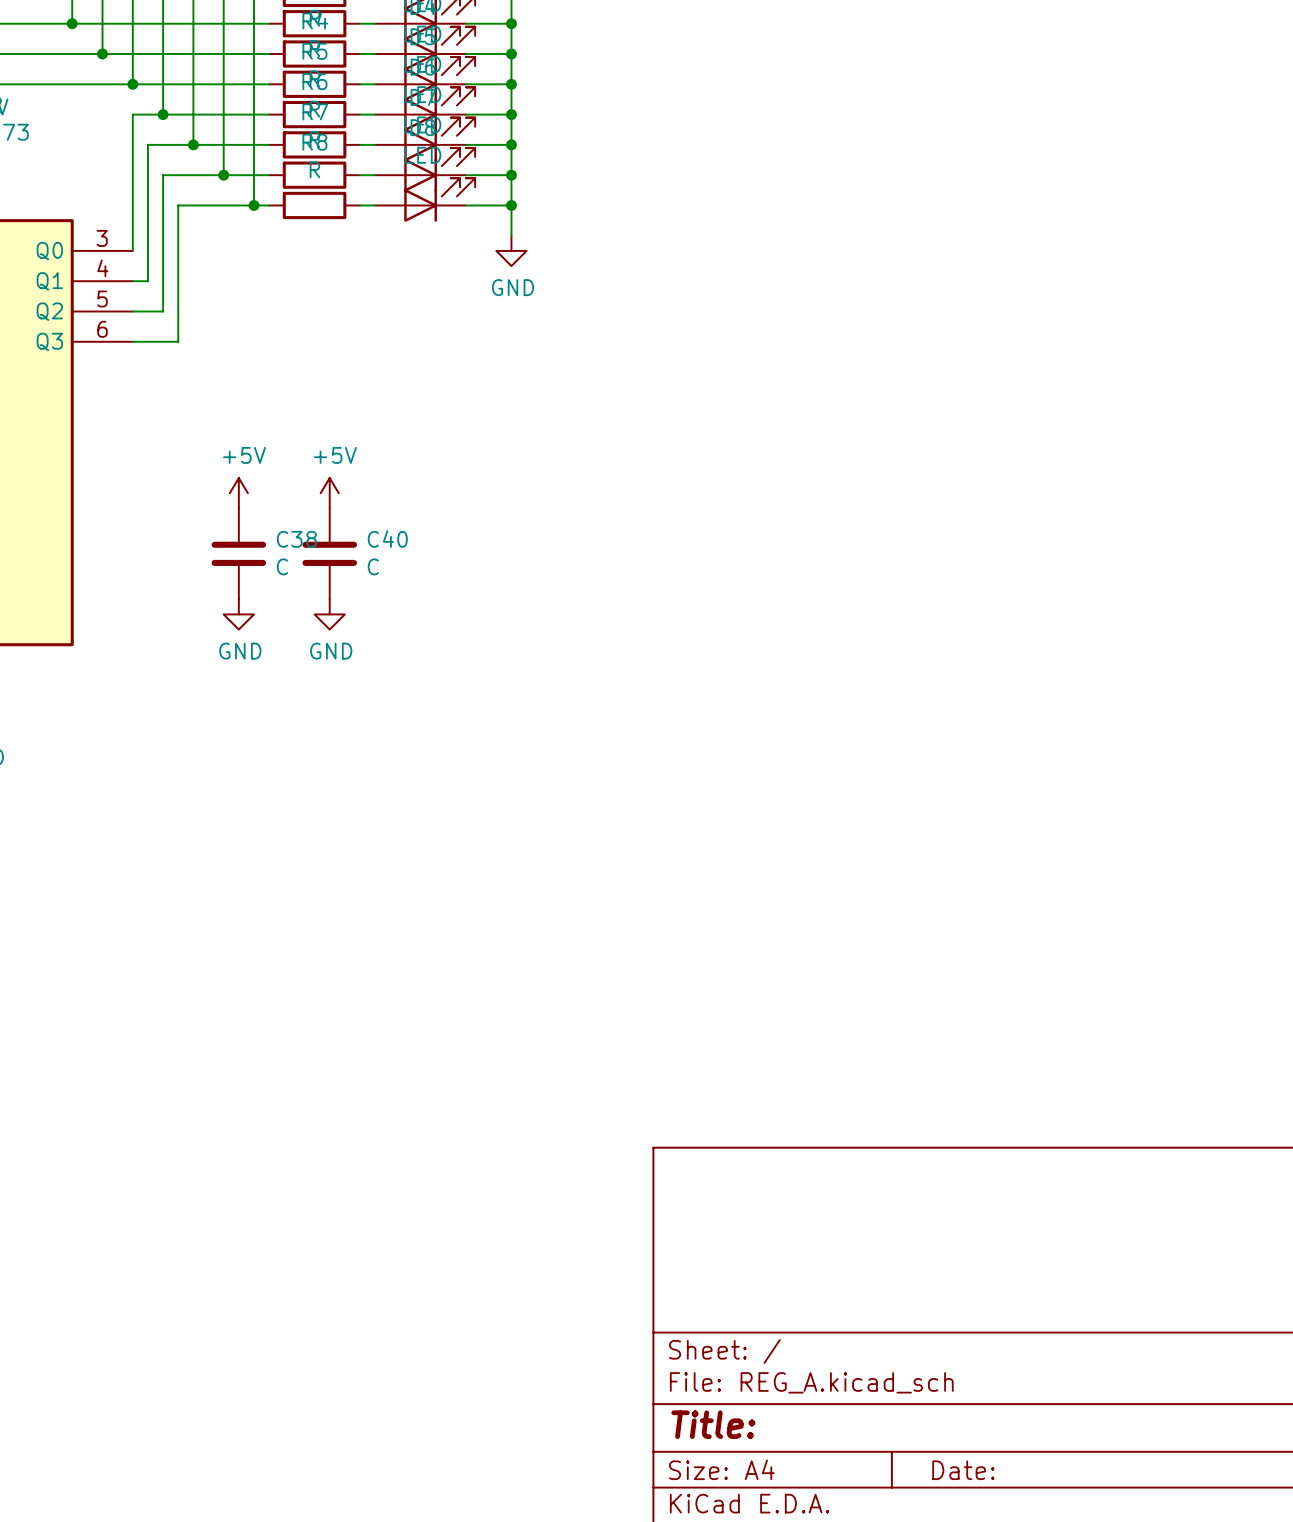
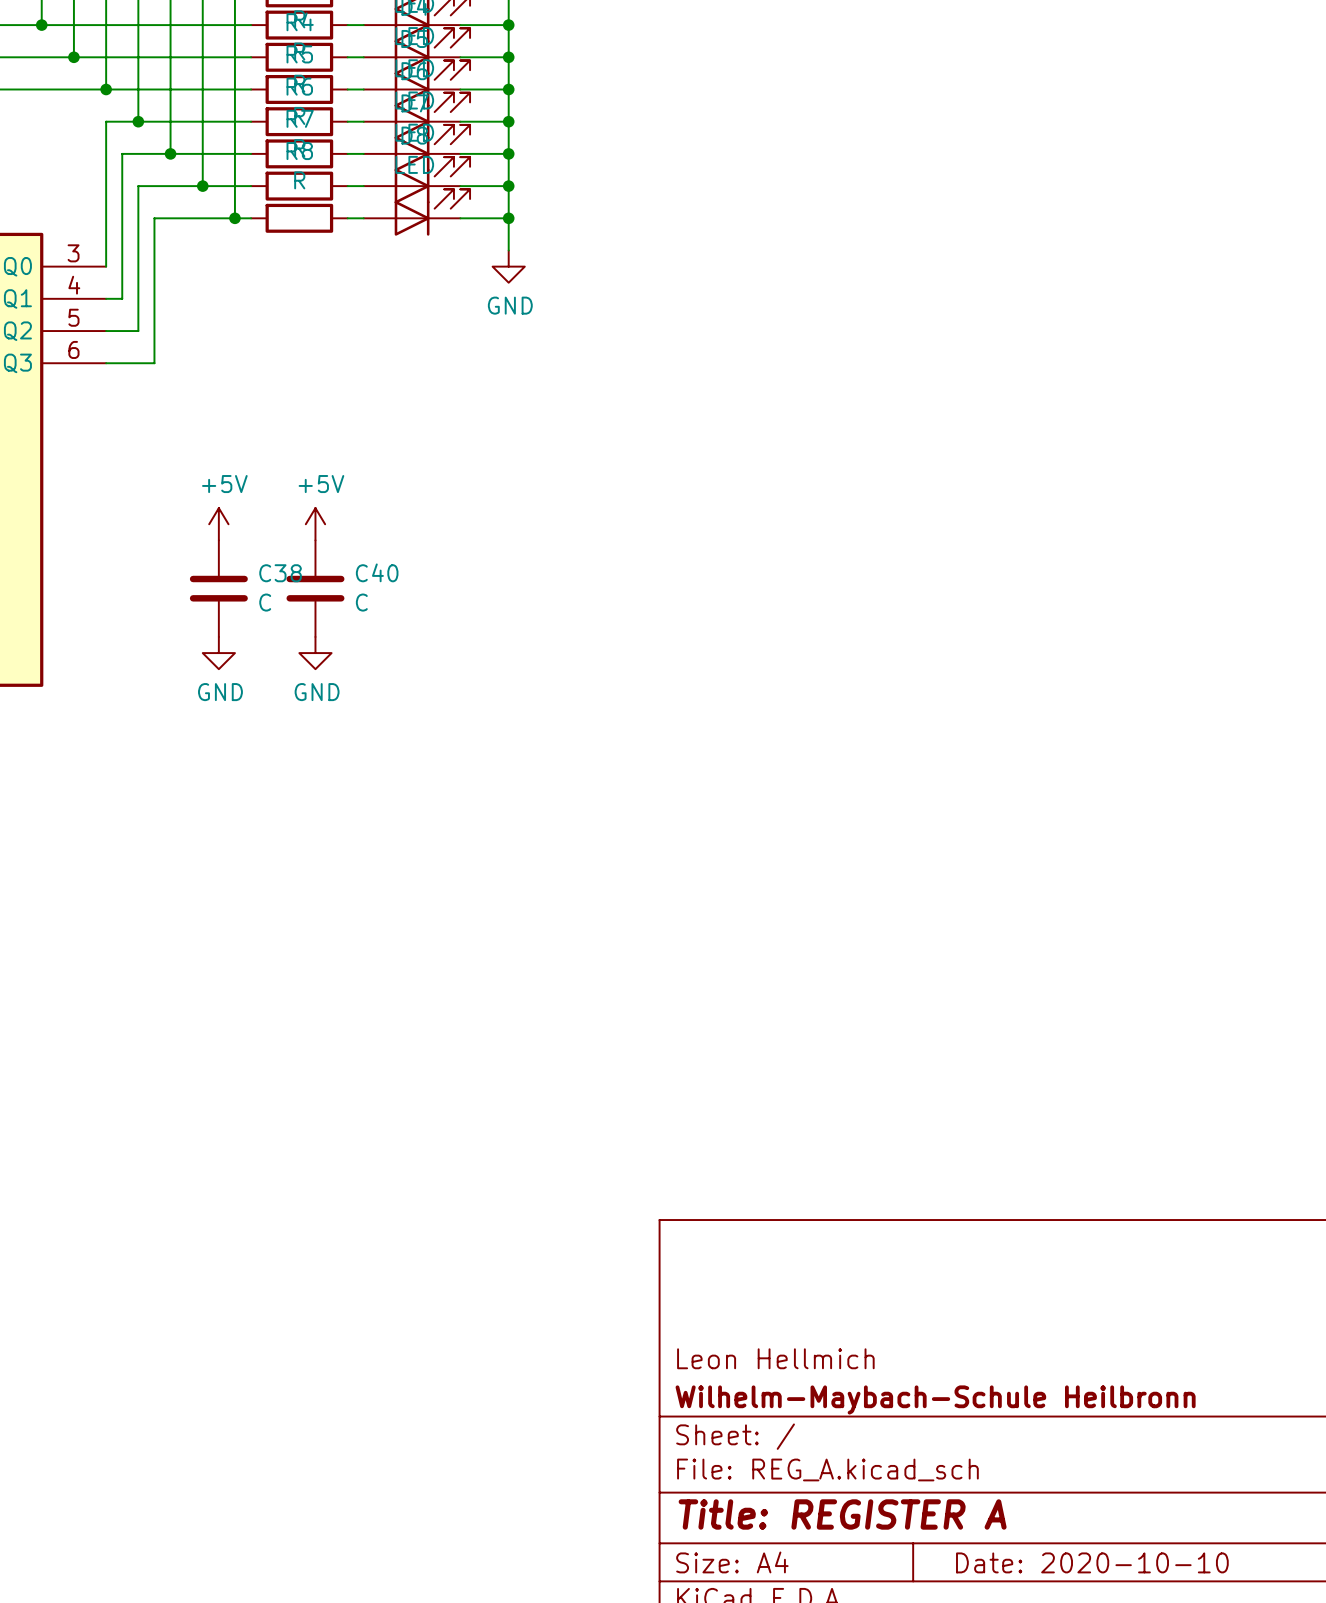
title block: none -> Leon Hellmich (775, 1358)
title block: none -> Wilhelm-Maybach-Schule Heilbronn (935, 1399)
title block: Title: (713, 1424) -> Title: REGISTER A (842, 1514)
title block: Date: (963, 1470) -> Date: 2020-10-10 (1092, 1562)

